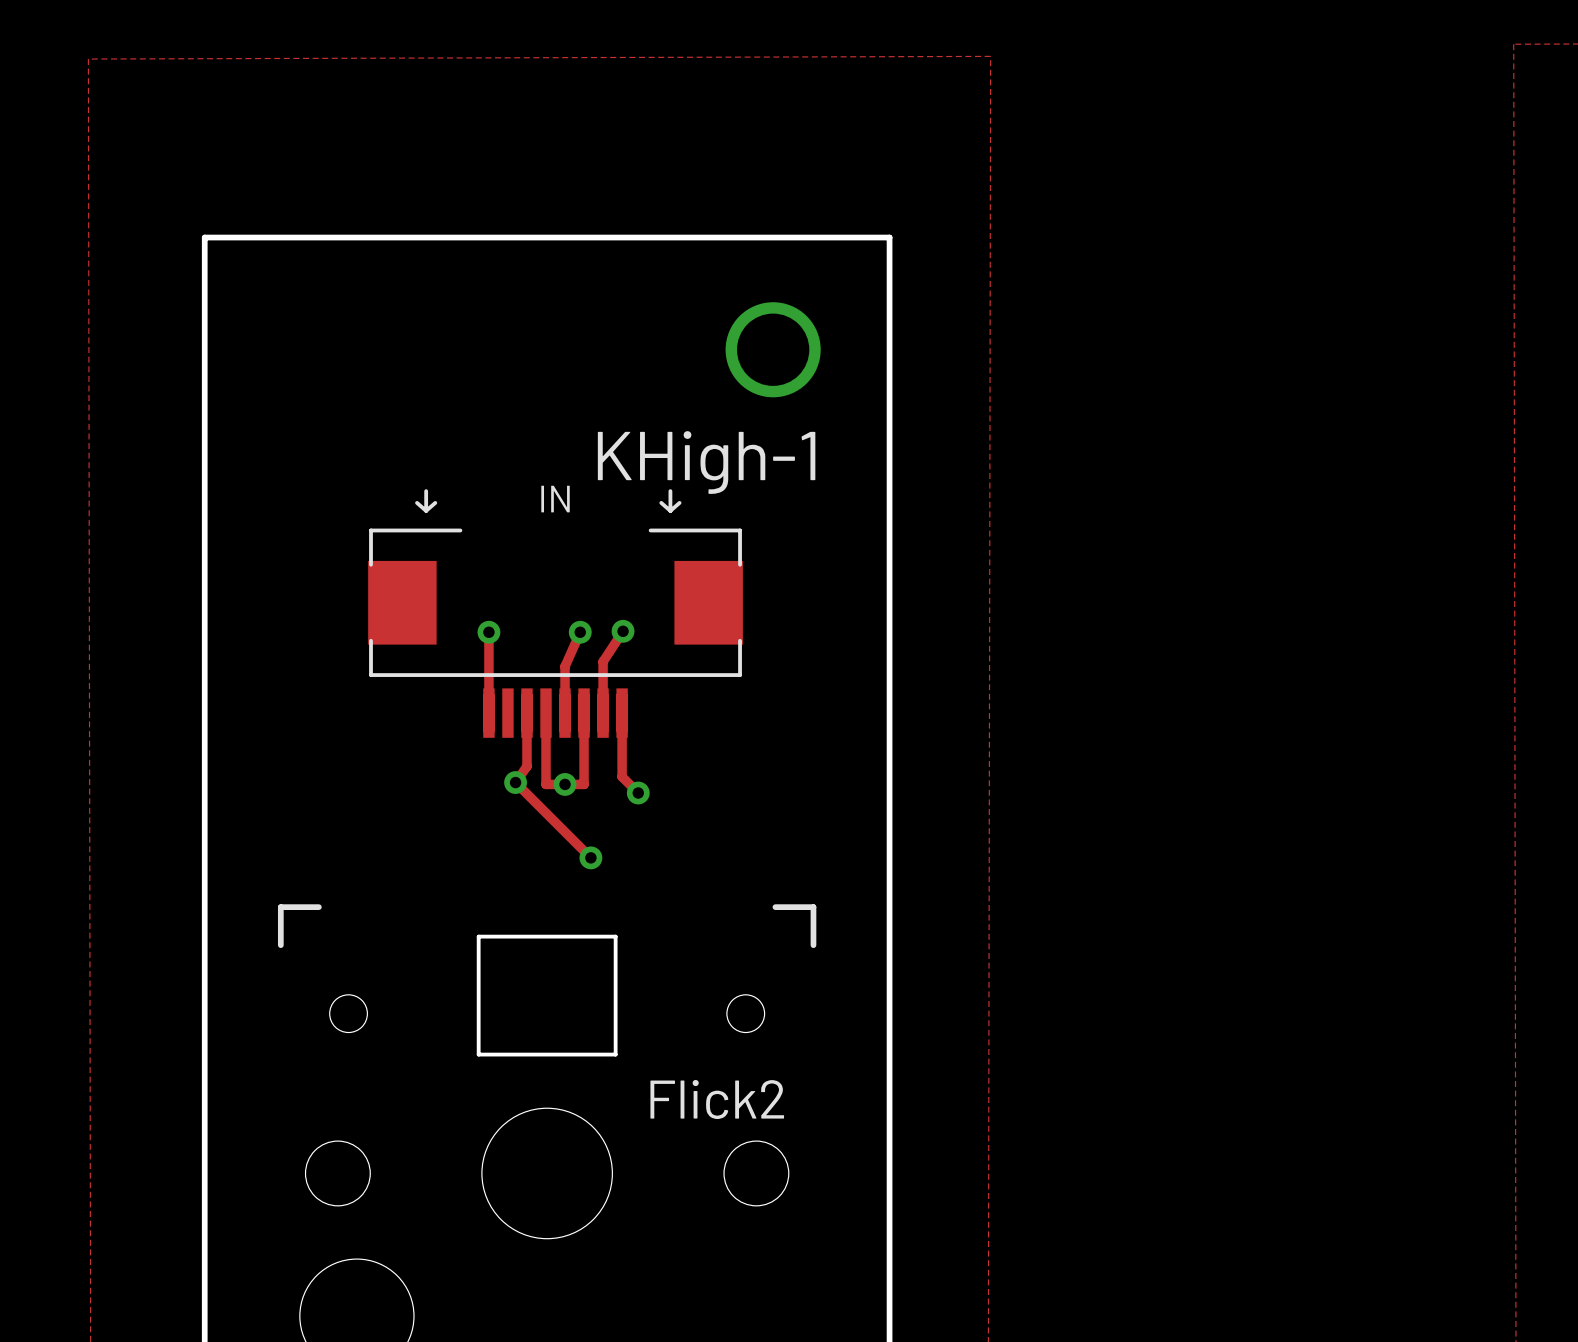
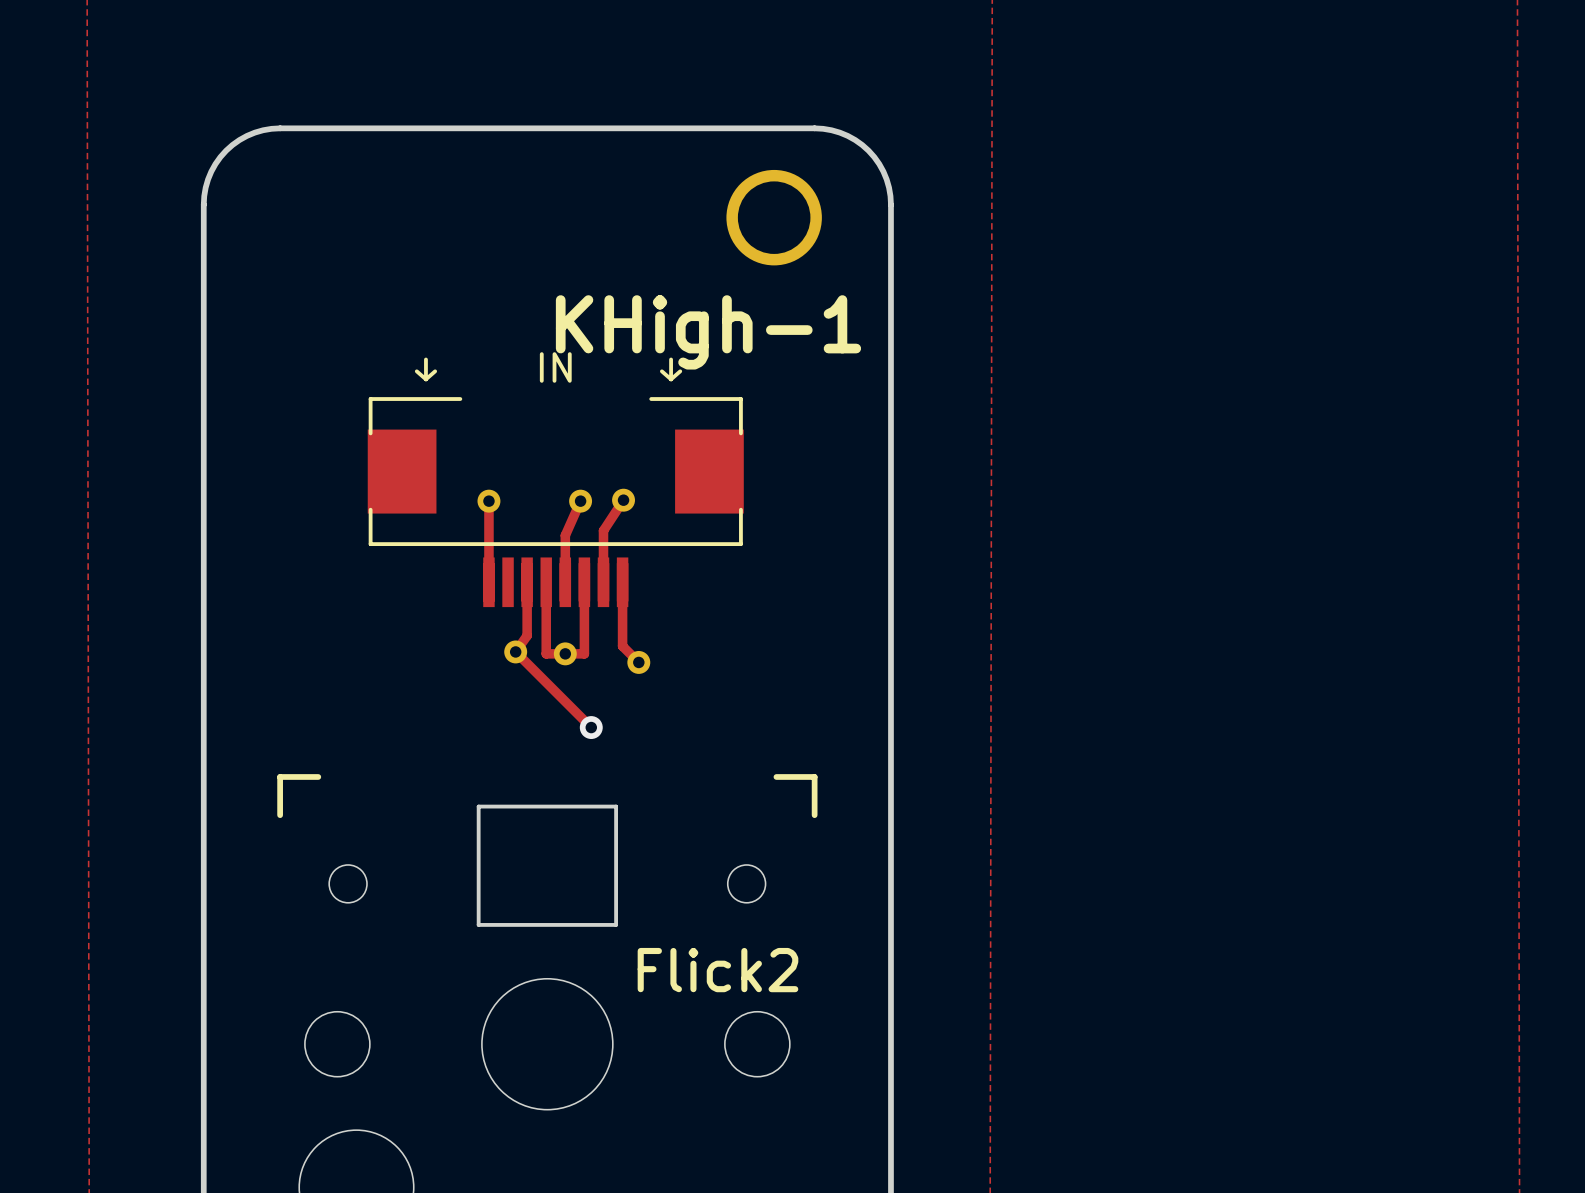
board edge: (204, 336) (204, 237) (889, 237) (889, 336) -> (203, 204) (208, 179) (215, 164) (226, 150) (246, 135) (263, 130) (280, 128) (823, 128) (839, 132) (855, 140) (874, 157) (886, 179) (890, 204)

